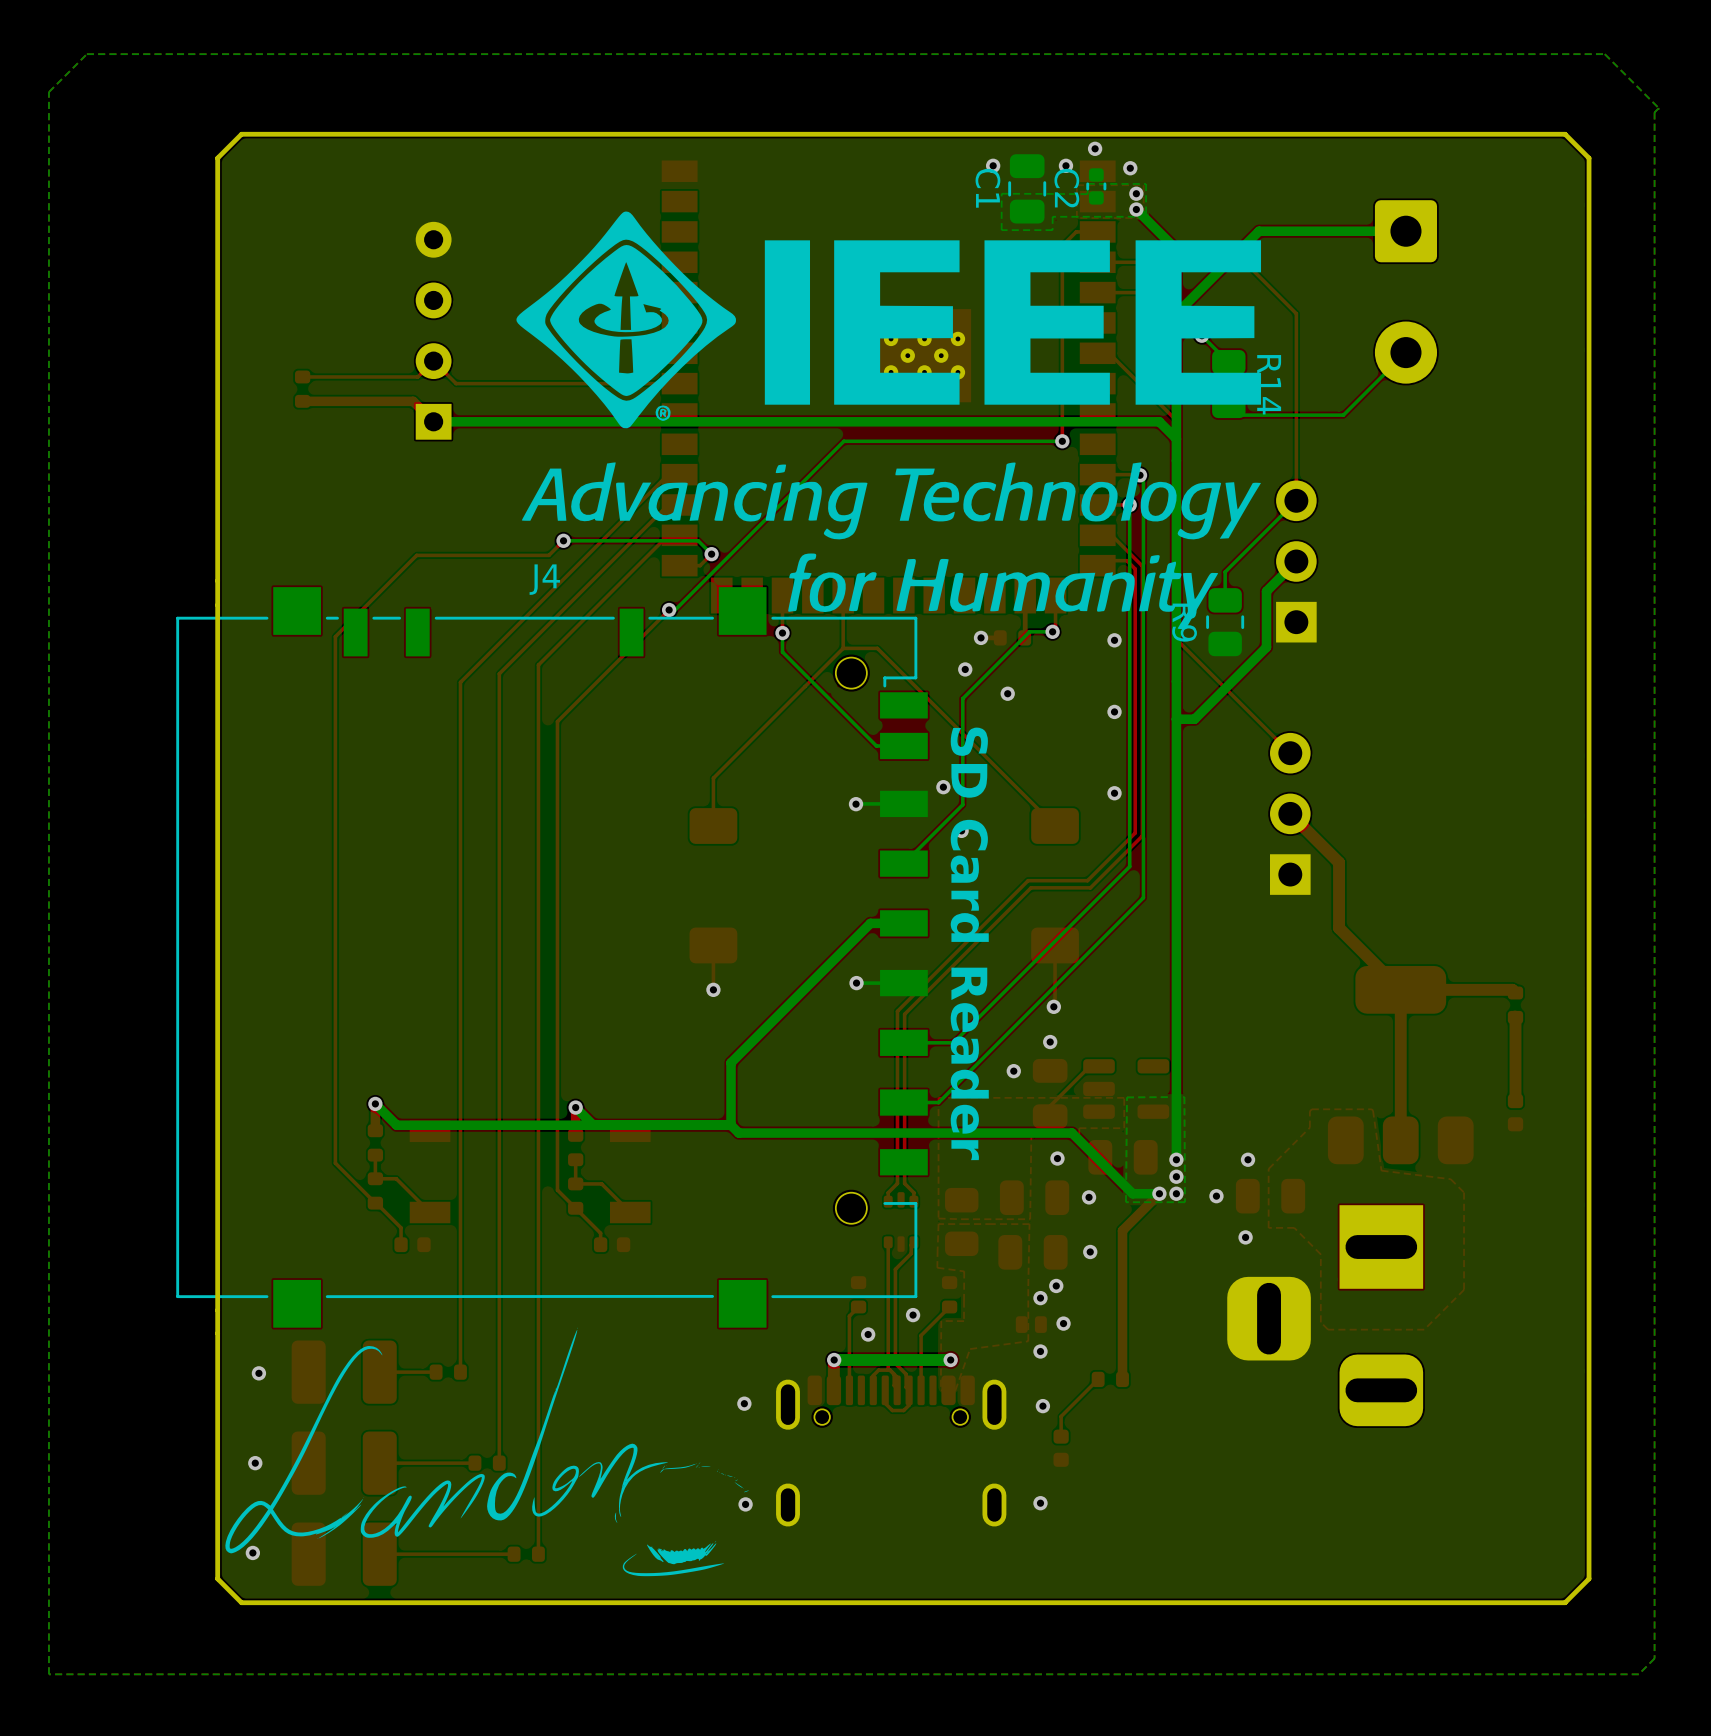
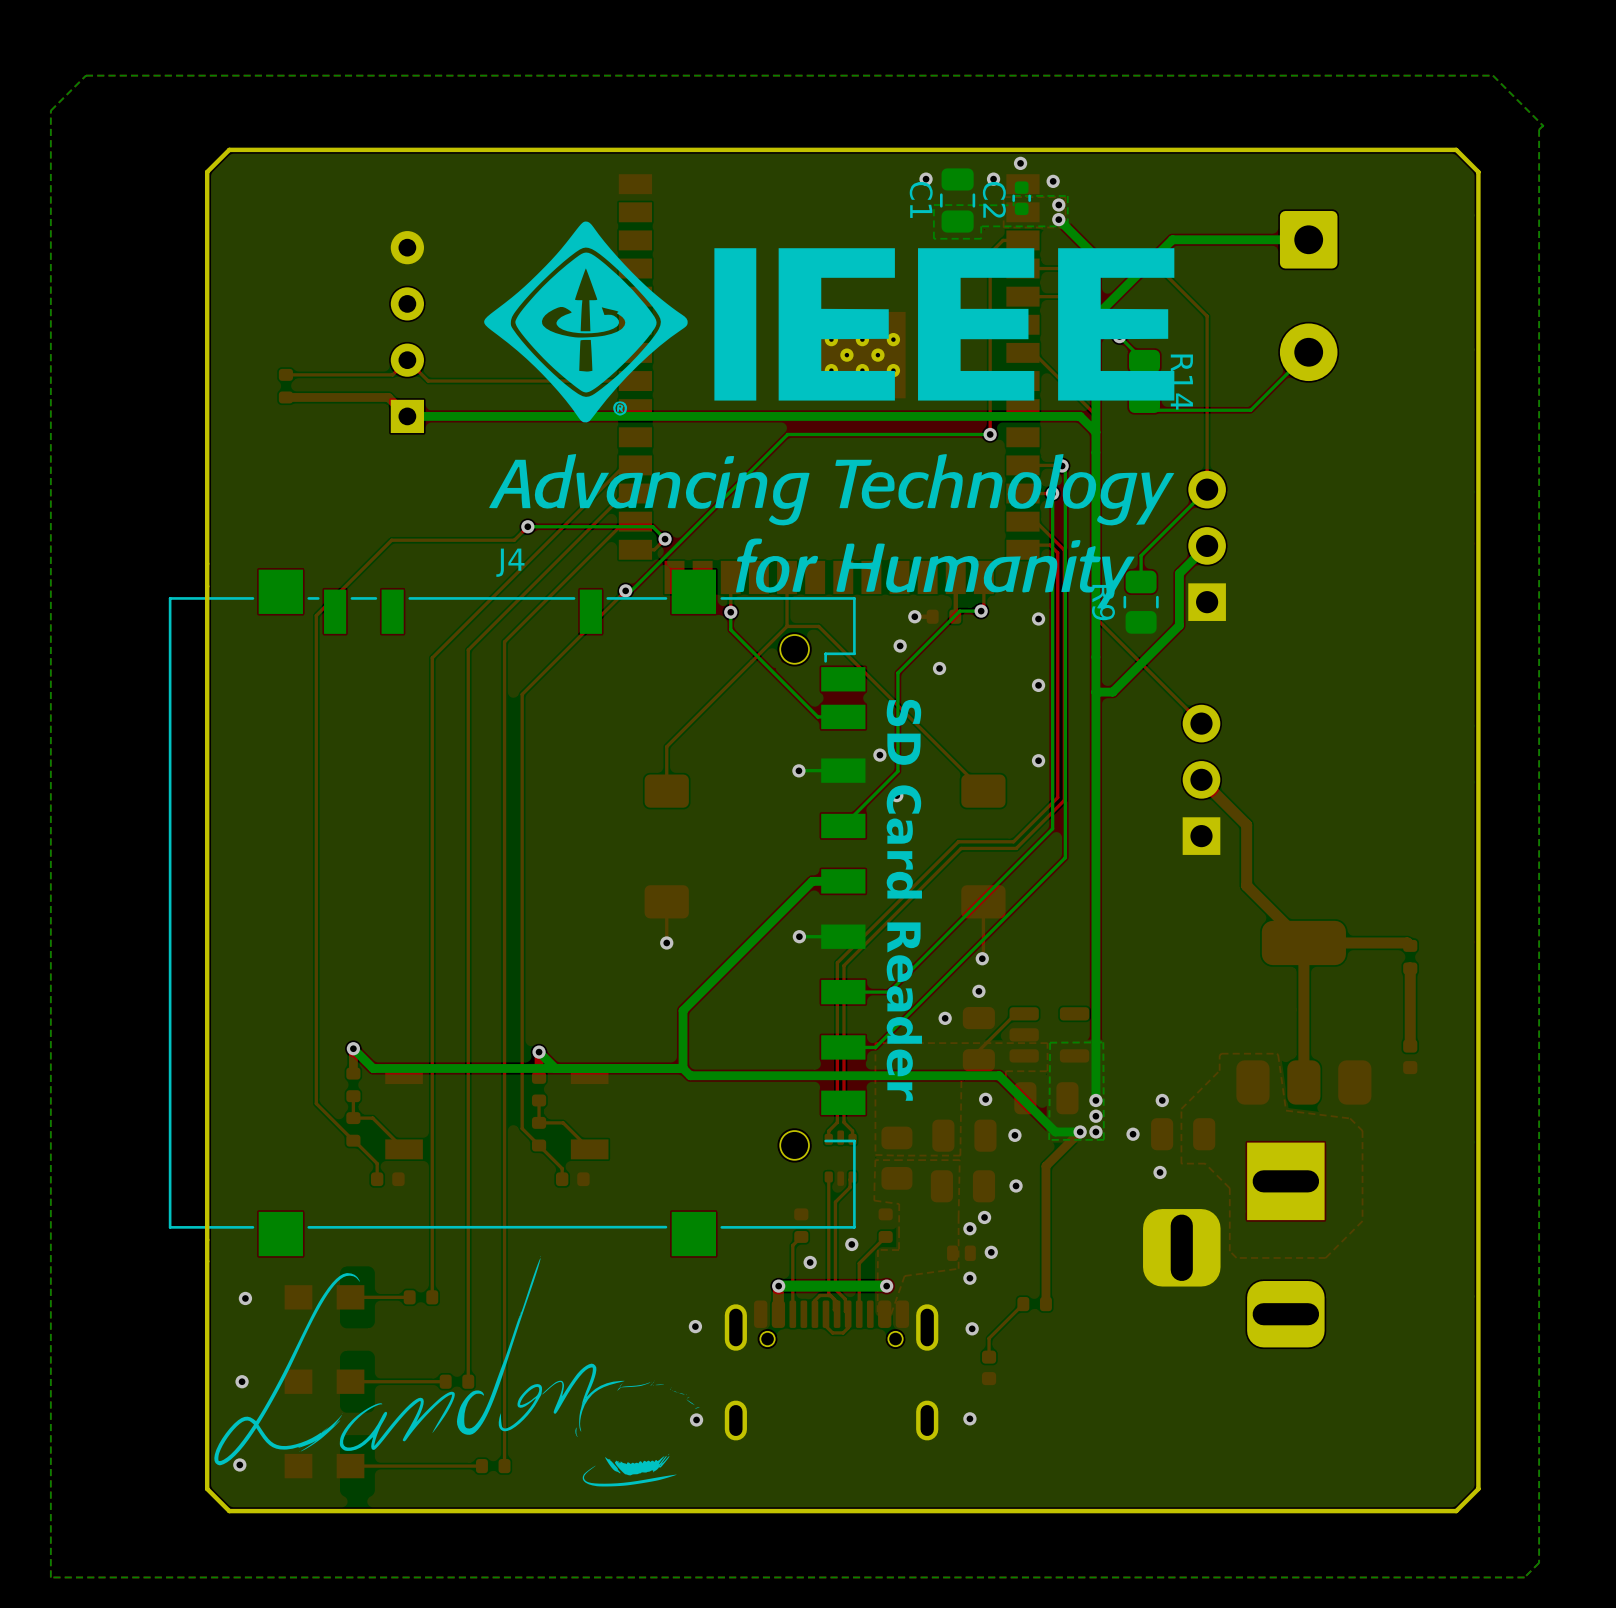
part footprint: [291, 1340, 397, 1404] -> [284, 1285, 365, 1310]
part footprint: [291, 1431, 397, 1495] -> [284, 1369, 365, 1394]
part footprint: [291, 1522, 397, 1586] -> [284, 1453, 365, 1479]

